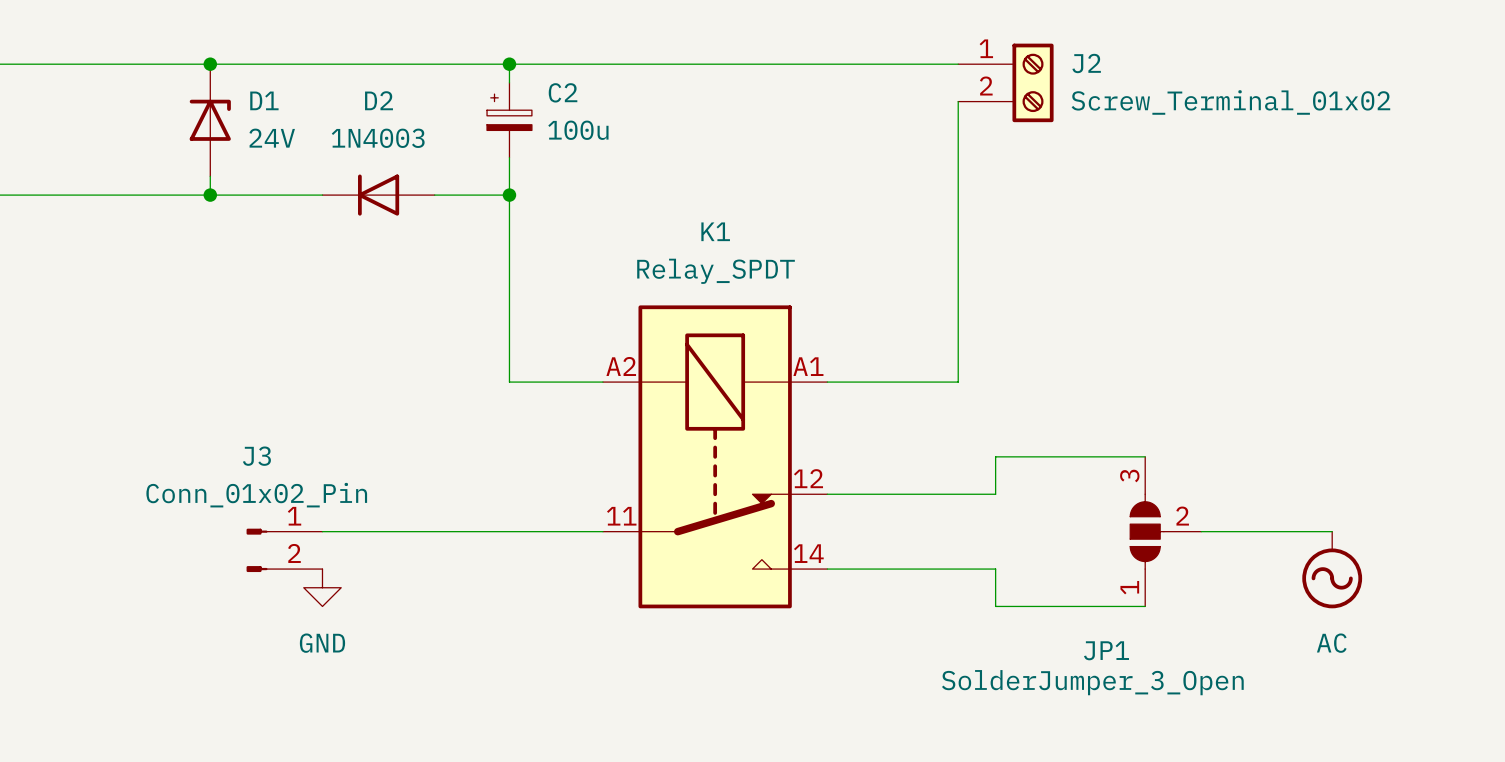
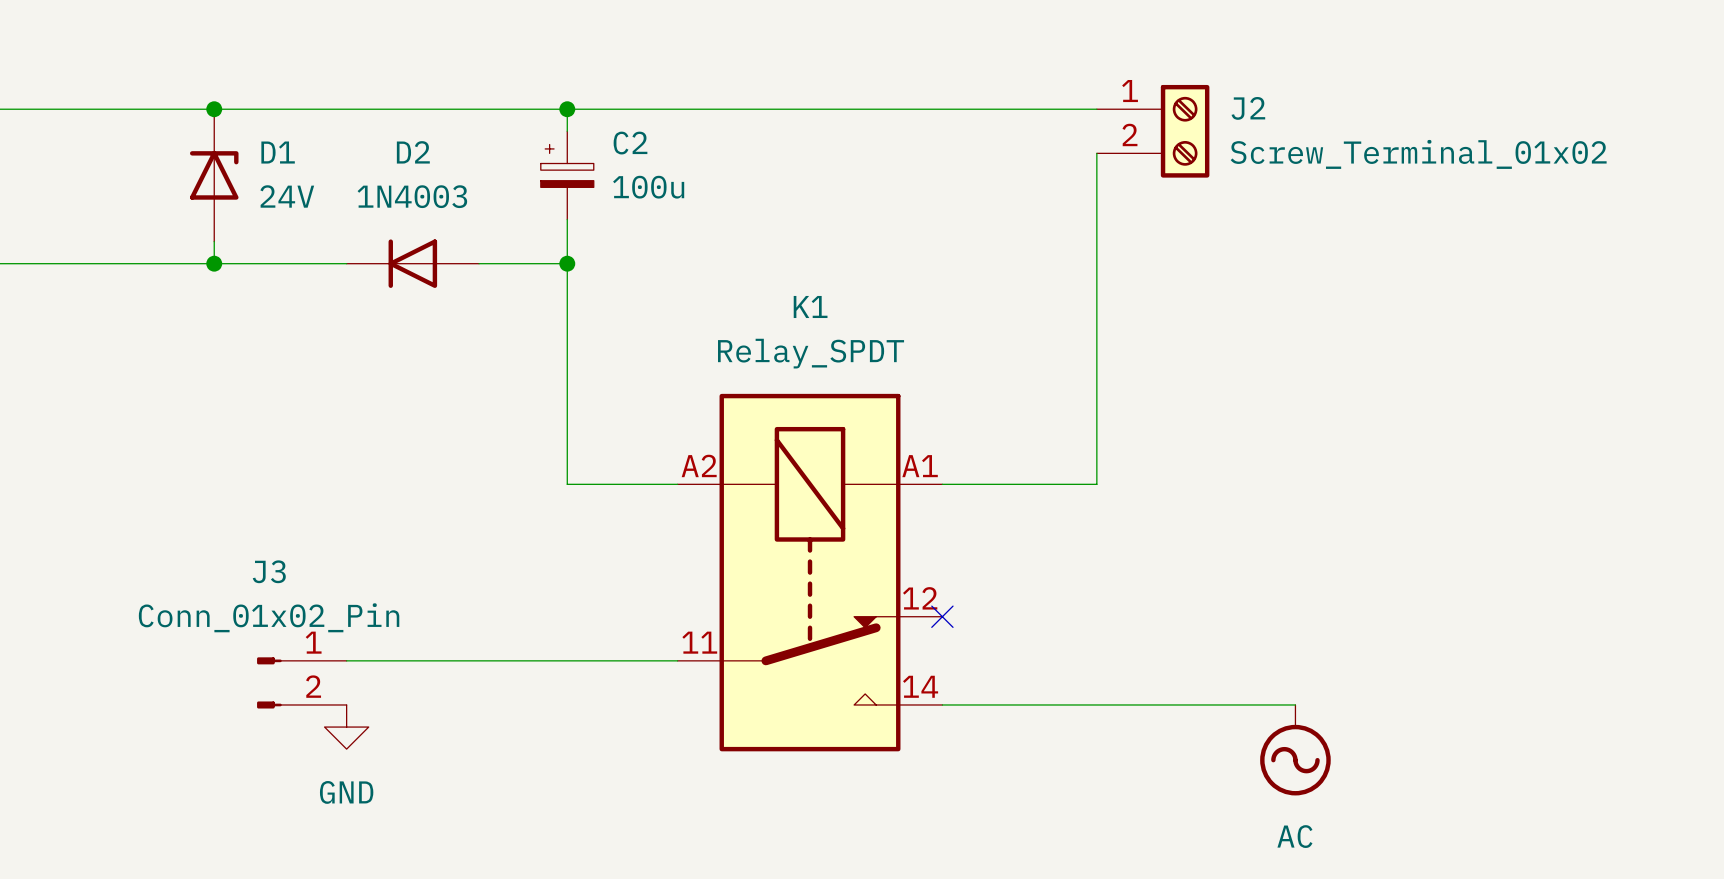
wire: (1145, 456) (995, 456) (995, 494) (827, 494) -> none
no-connect mark: none -> (942, 616)
JP1: SolderJumper_3_Open (1165, 531) -> none
wire: (1201, 531) (1332, 531) -> none
wire: (995, 569) (995, 606) (1145, 606) -> (1140, 704) (1295, 704)
power symbol position: AC (1332, 569) -> AC (1295, 750)

